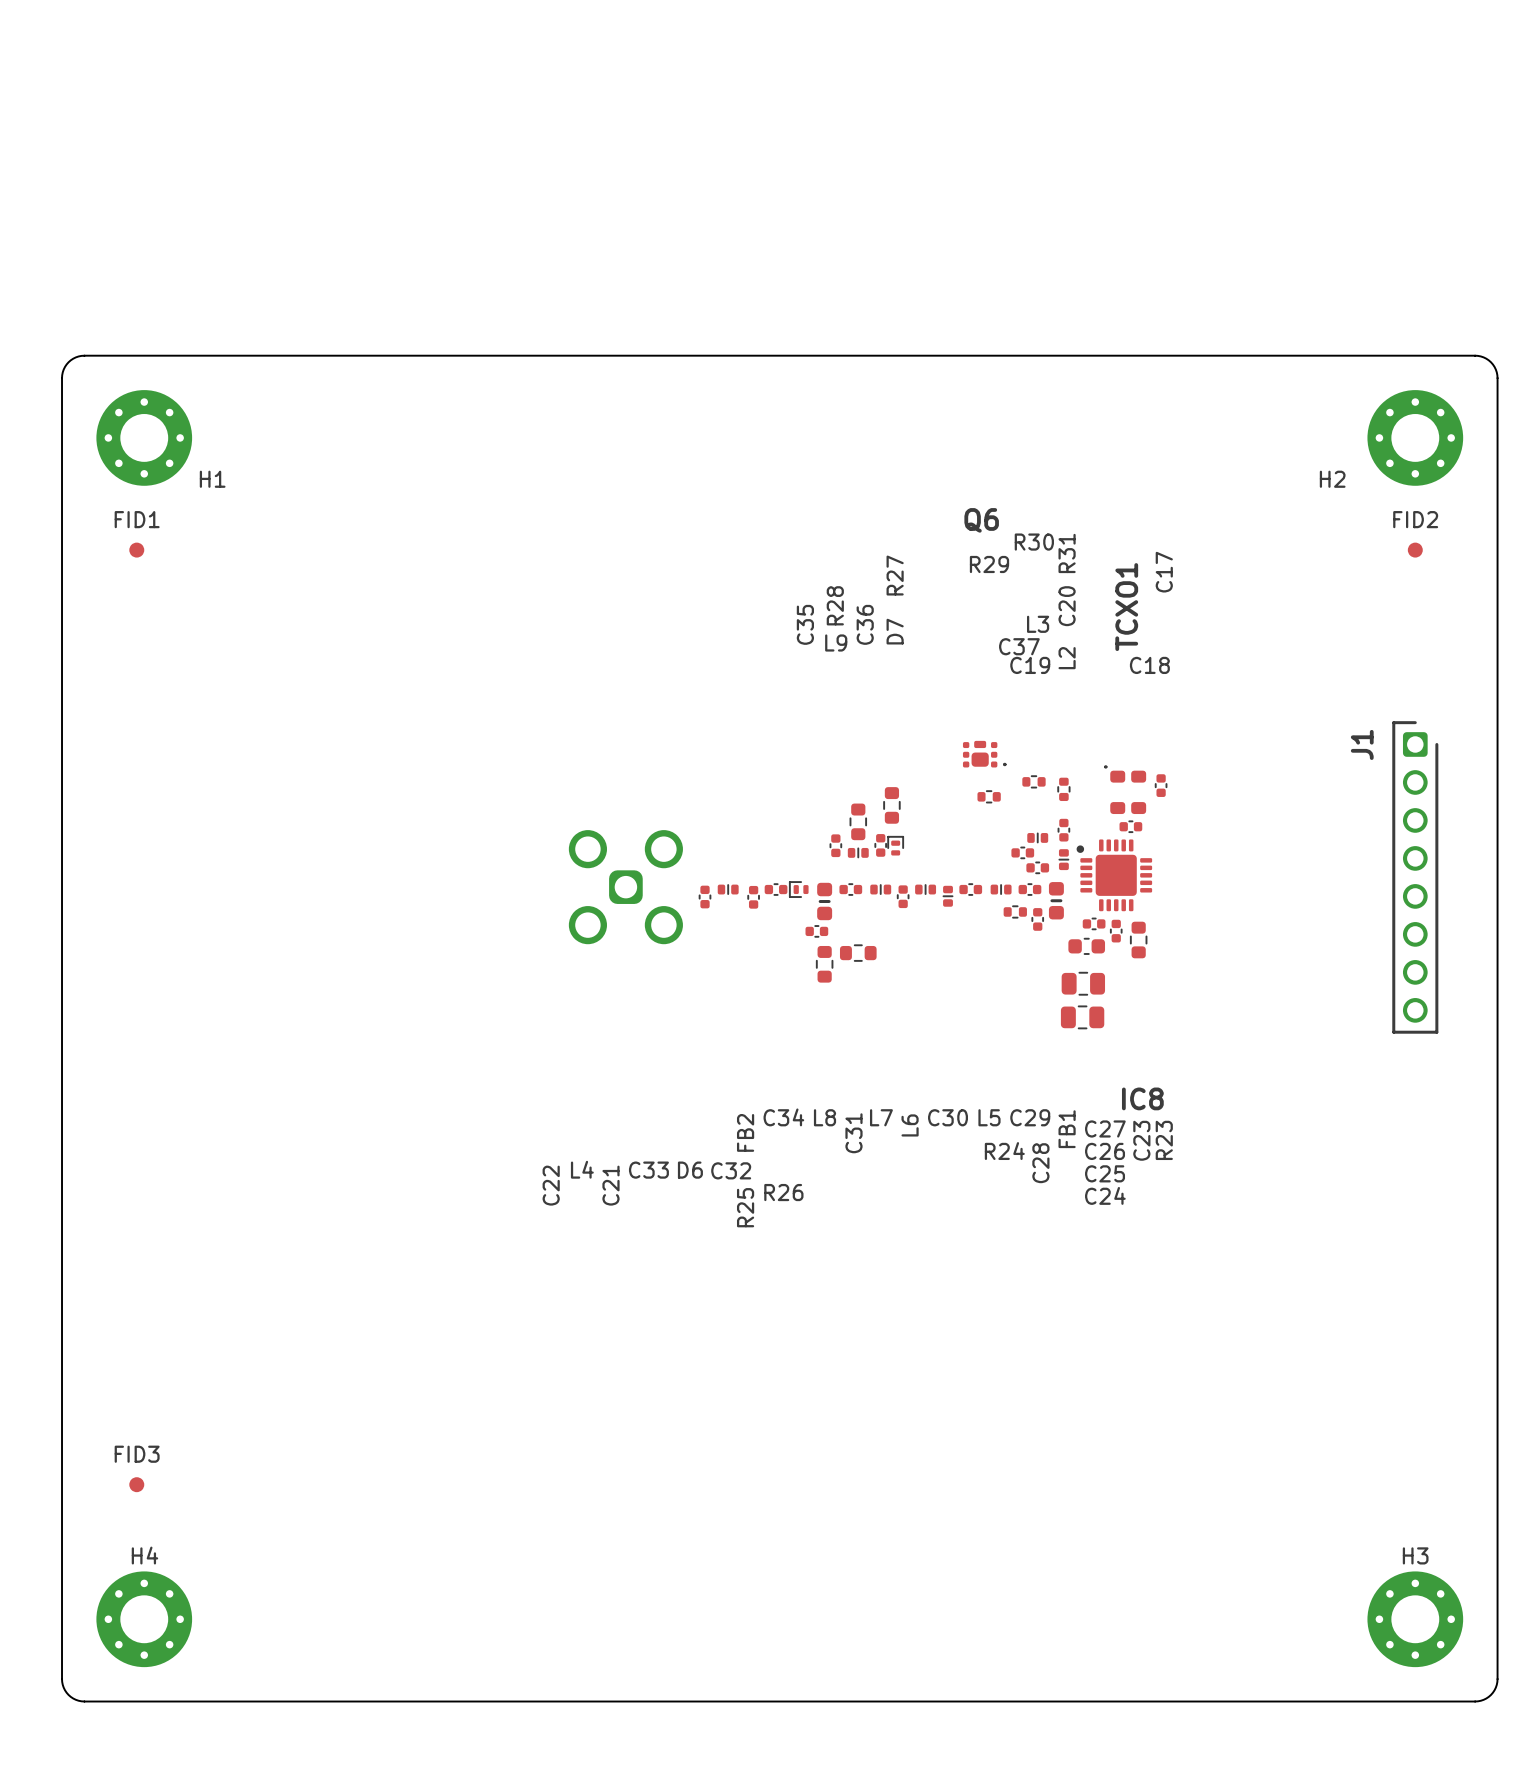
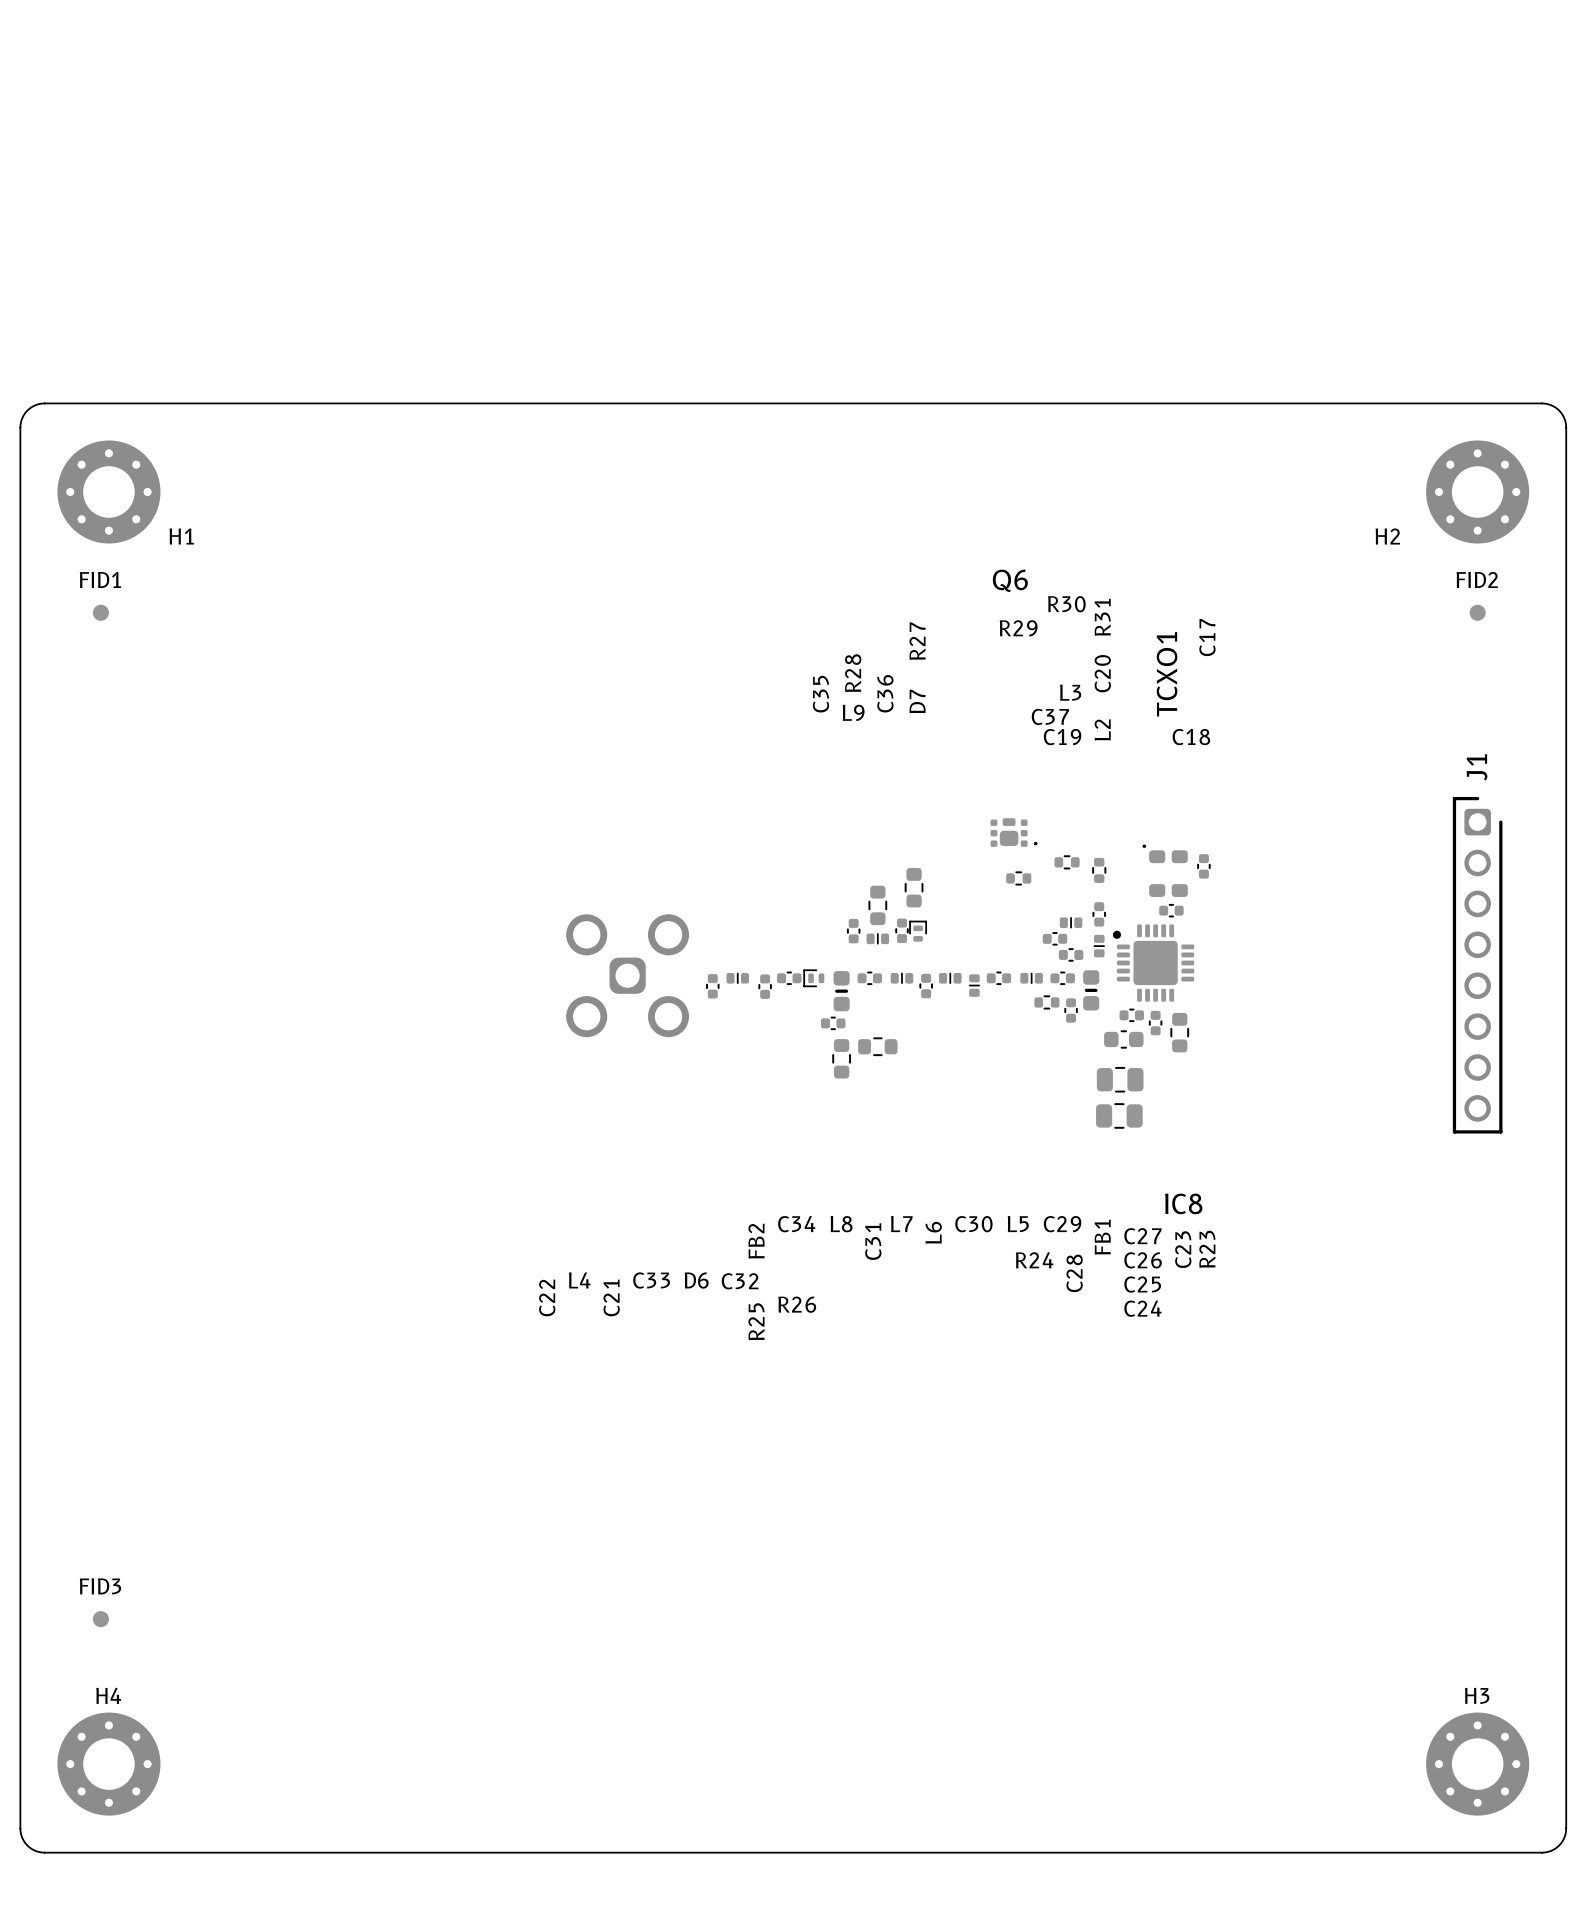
J1 name position: J1 (1362, 744) -> J1 (1477, 767)

